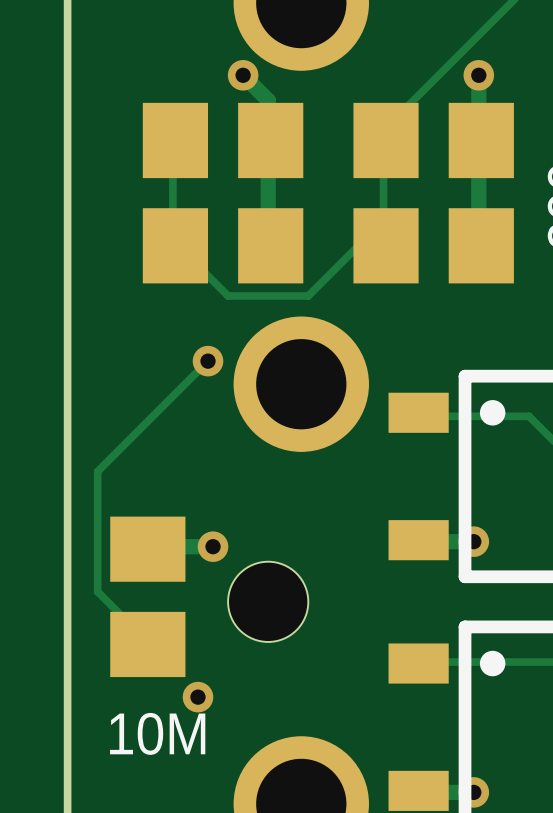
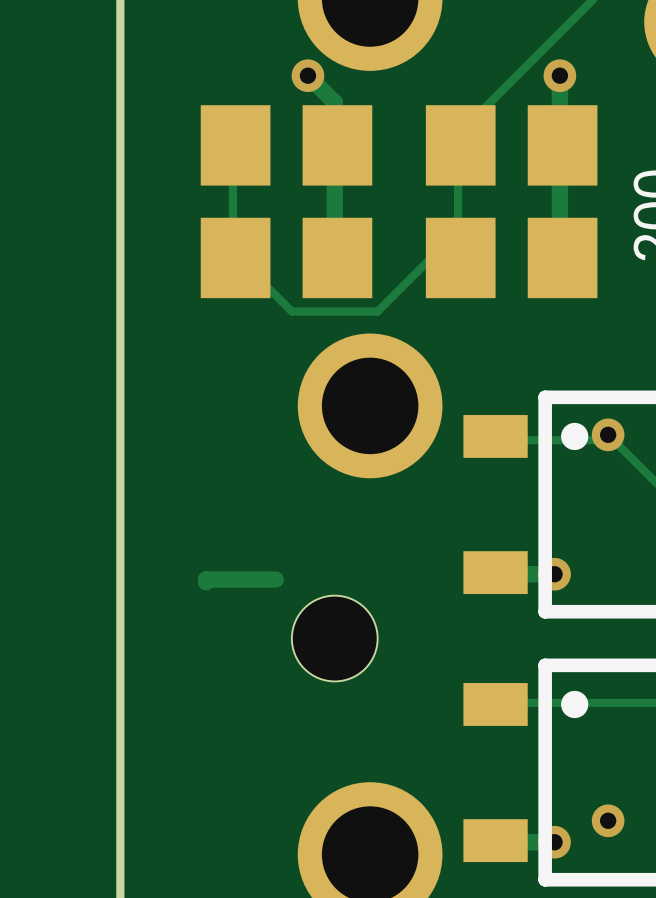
track: (208, 361) (97, 471) (97, 591) (147, 641) (147, 644) -> none
via: (208, 361) -> none
via: none -> (608, 434)
via: (213, 546) -> none
part: 10M (147, 596) -> none
via: (197, 697) -> none
via: none -> (608, 820)

